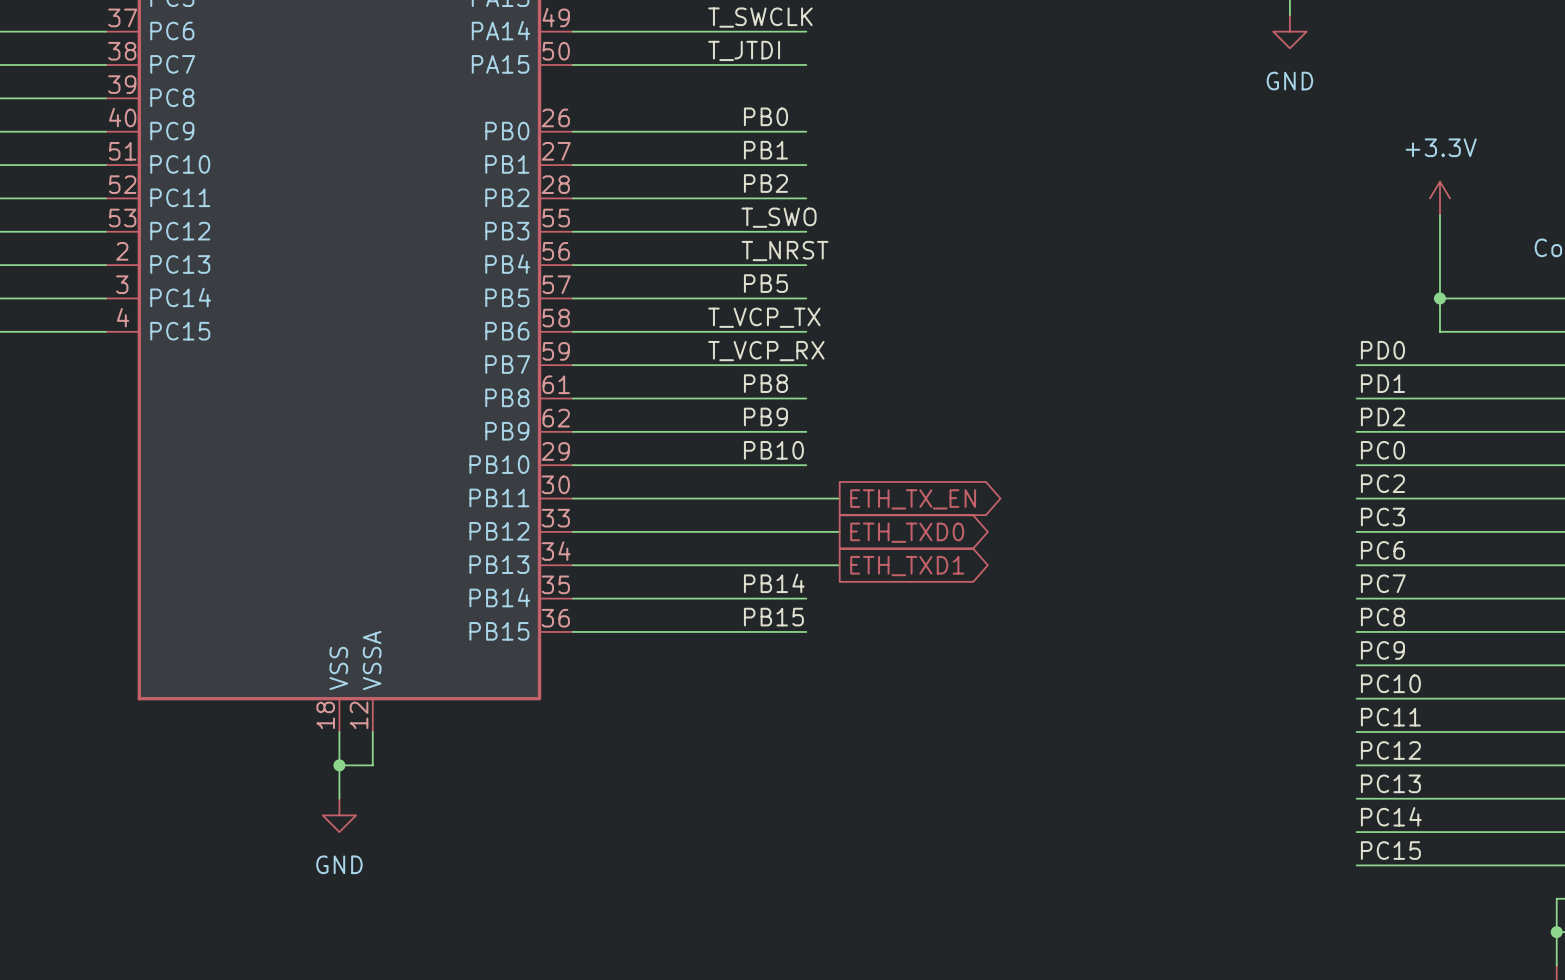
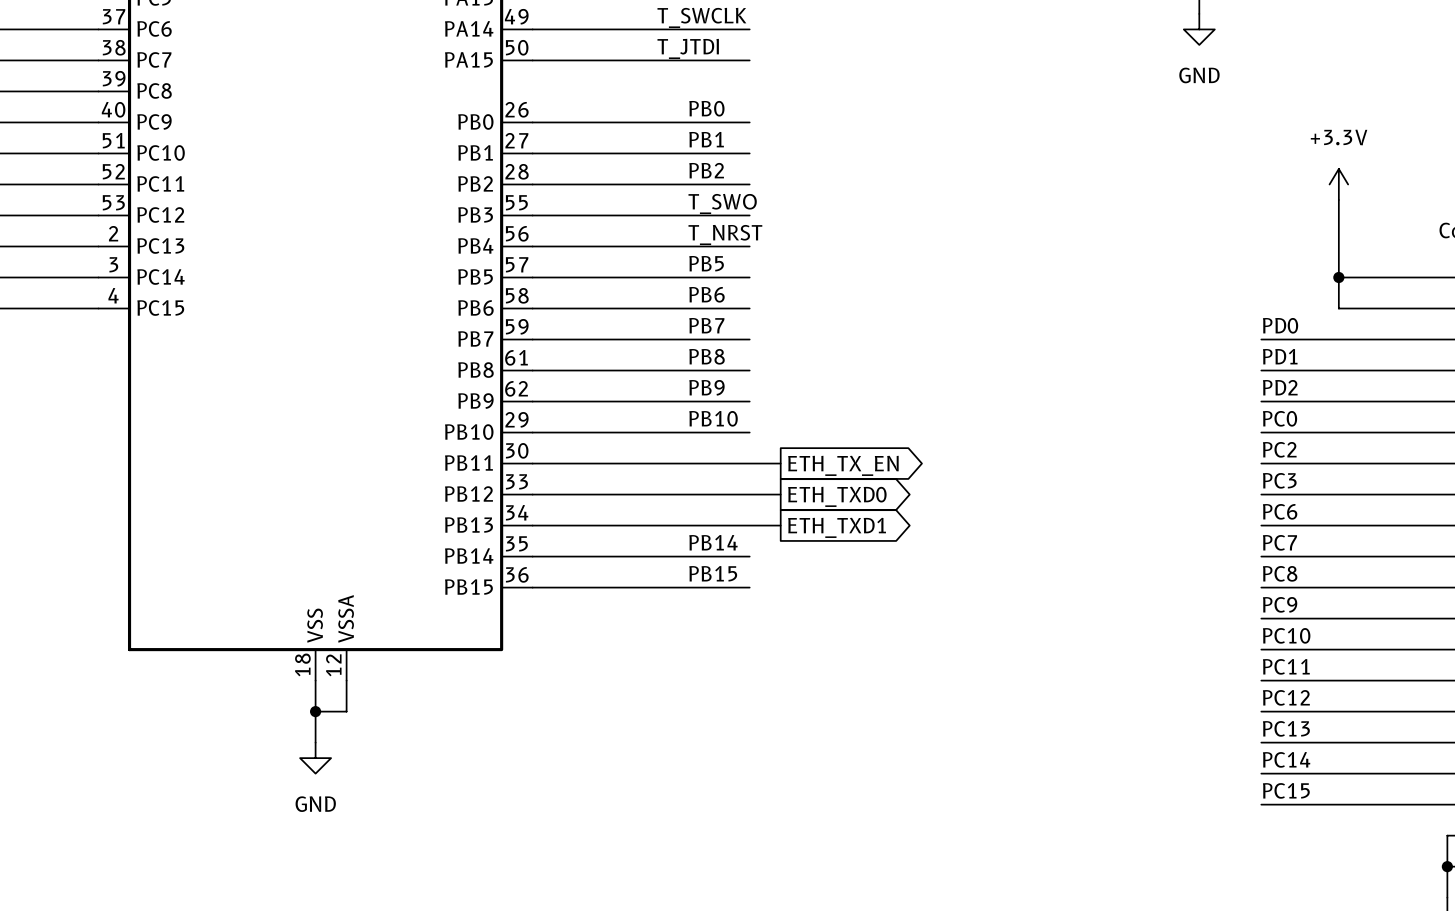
label: none -> PB6 (706, 294)
label: T_VCP_TX (764, 317) -> none
label: none -> PB7 (706, 325)
label: T_VCP_RX (766, 351) -> none

